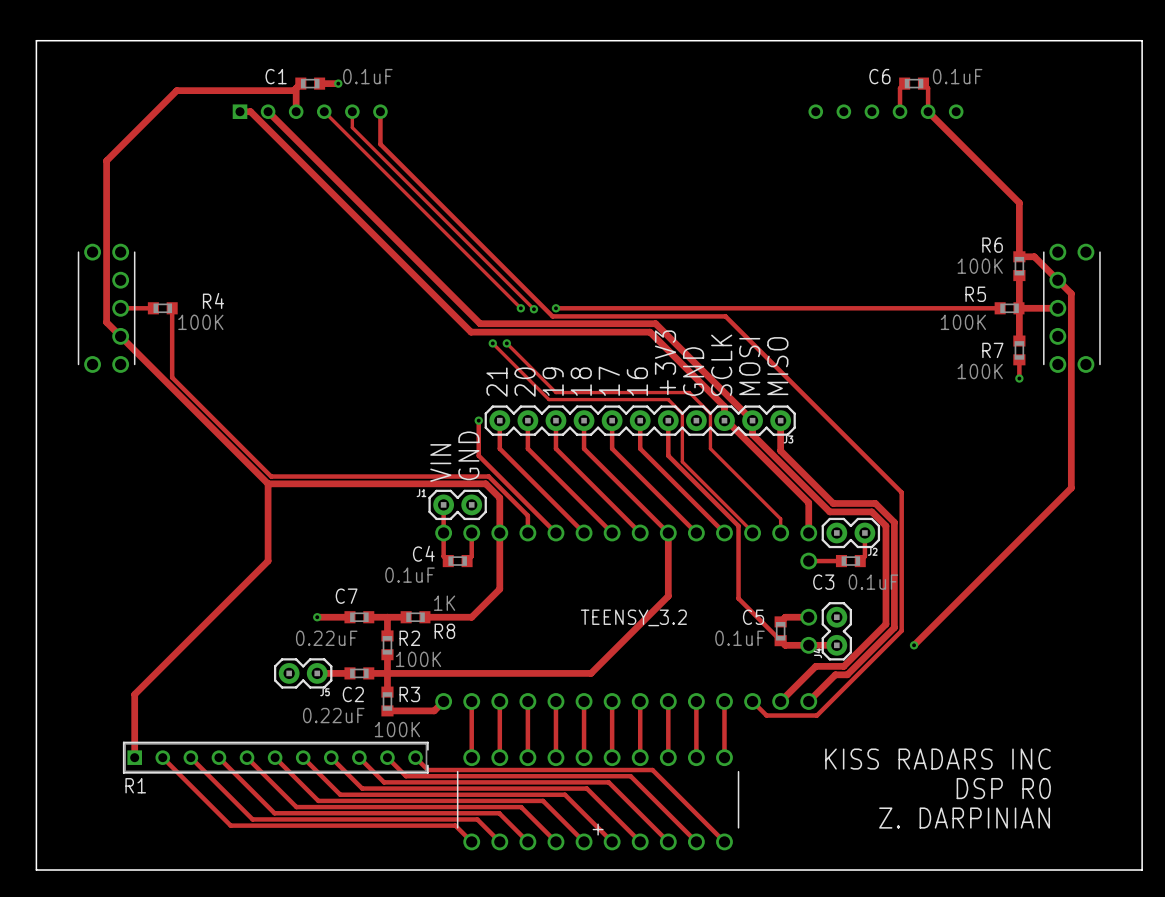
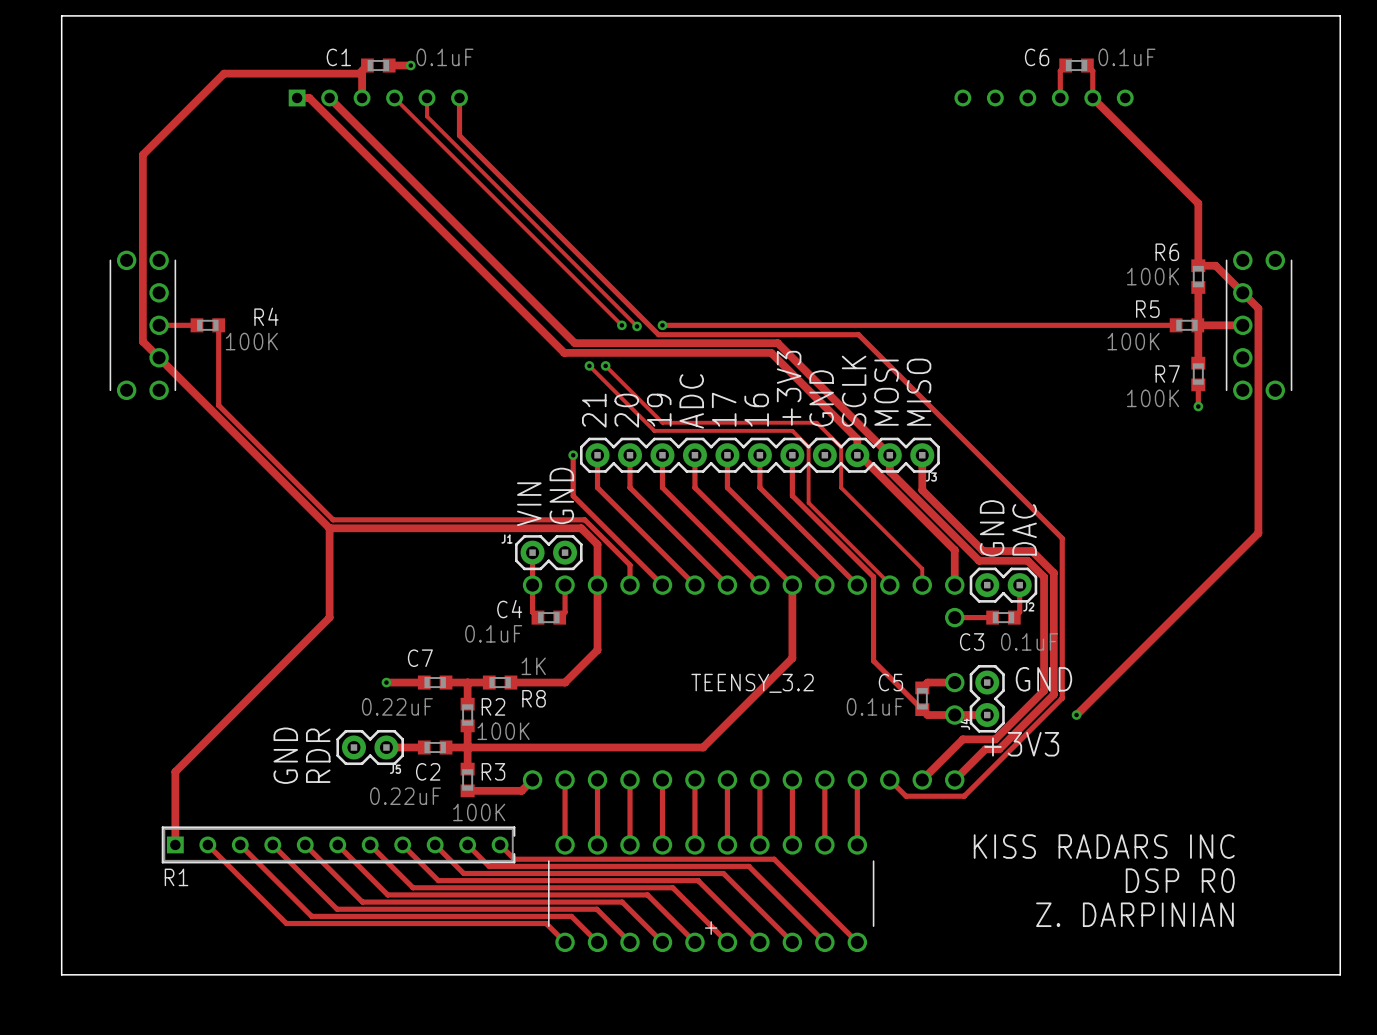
text: 18 (581, 381) -> ADC (691, 401)
text: none -> GND (992, 528)
text: none -> DAC (1024, 529)
text: none -> GND (1043, 679)
text: none -> +3V3 (1021, 744)
text: none -> GND (285, 755)
text: none -> RDR (318, 755)

